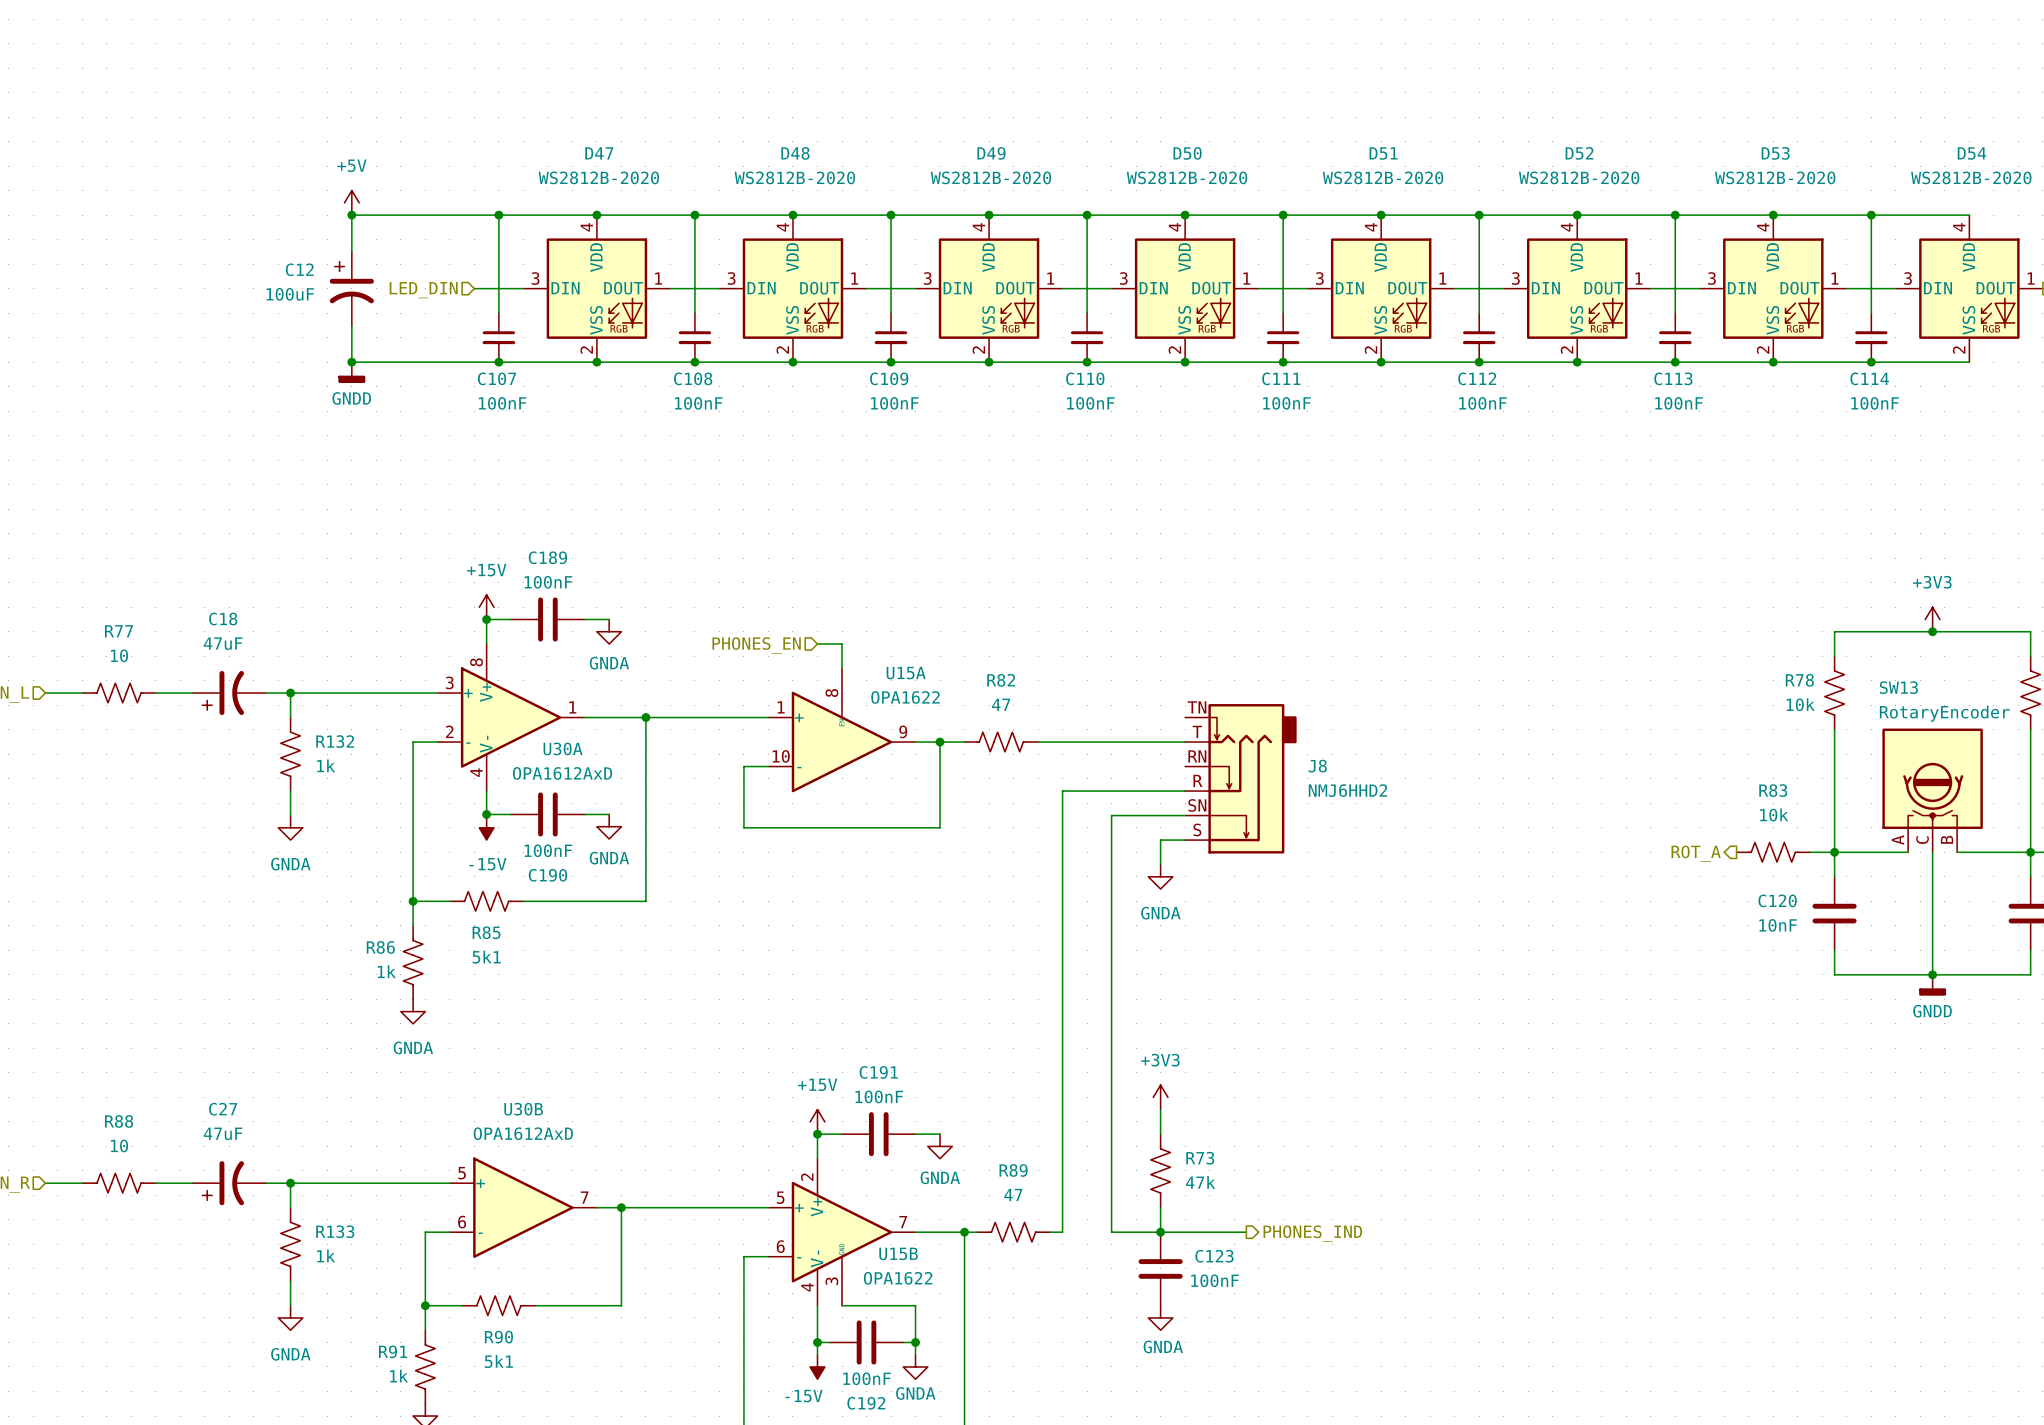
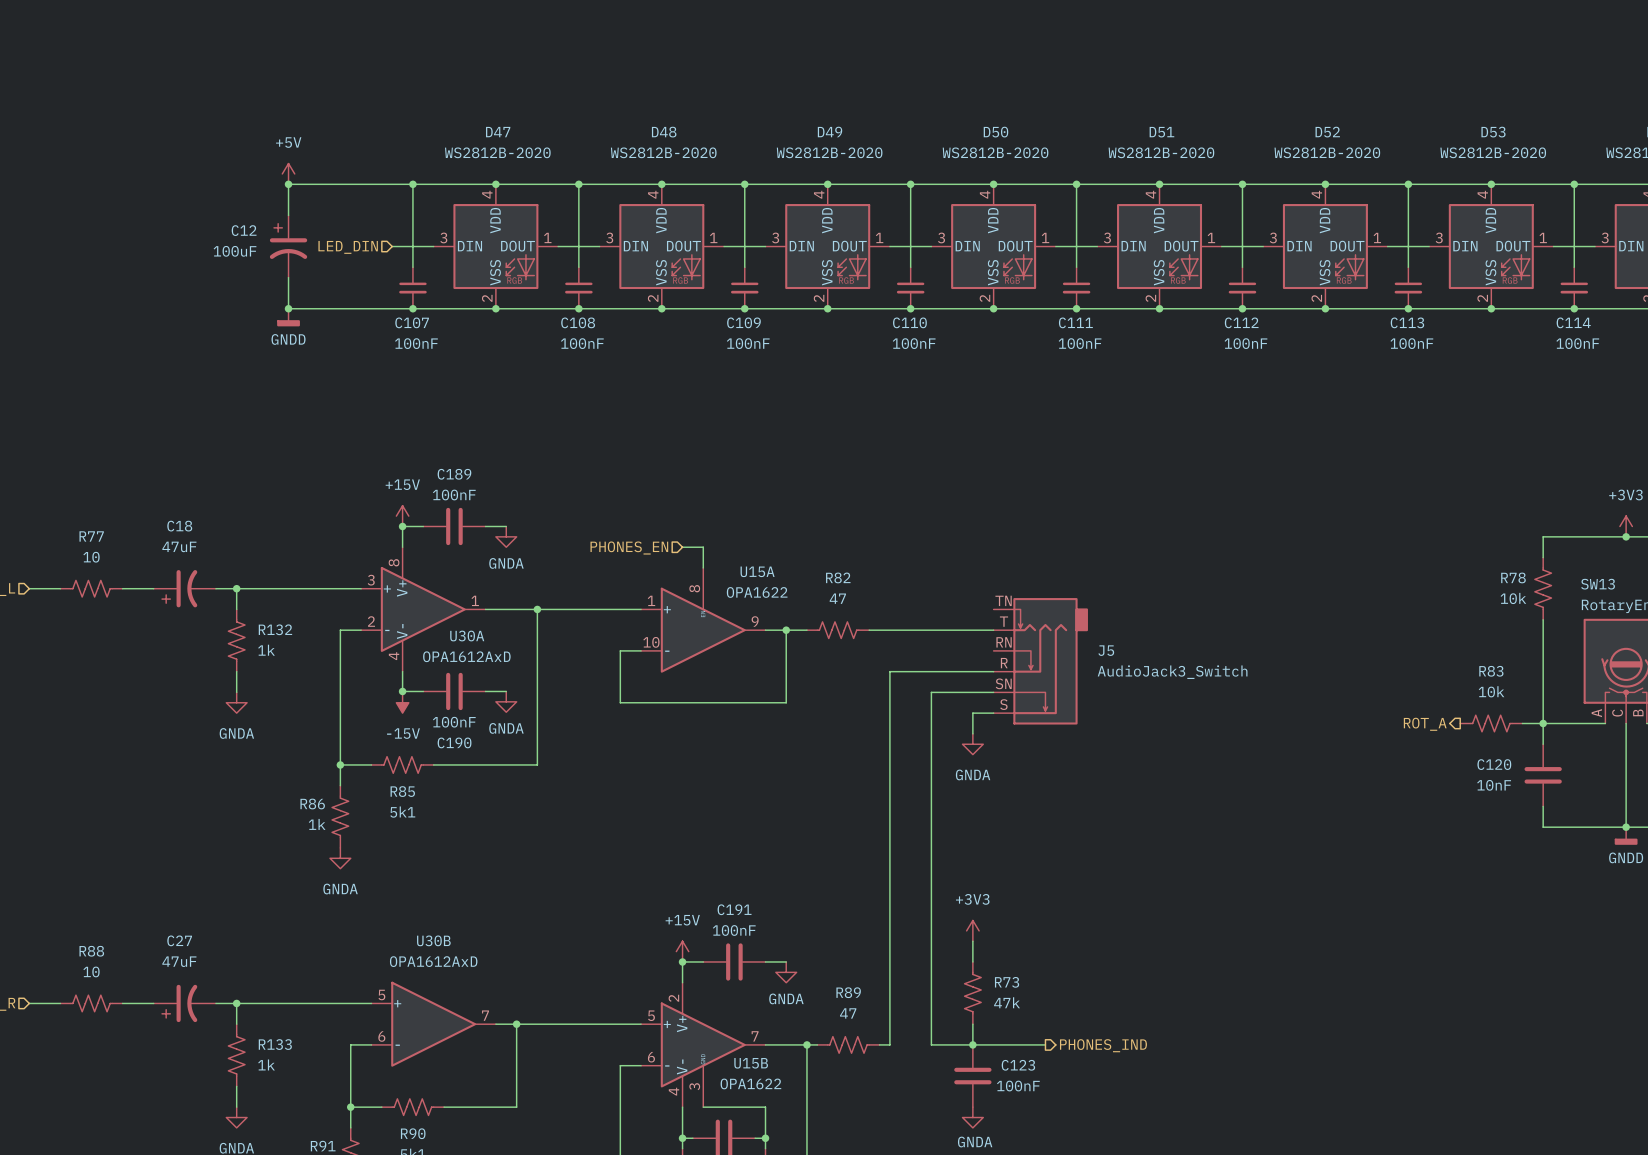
J8 name: J8 (1317, 766) -> J5 (1106, 650)
J8 value: NMJ6HHD2 (1347, 790) -> AudioJack3_Switch (1172, 672)

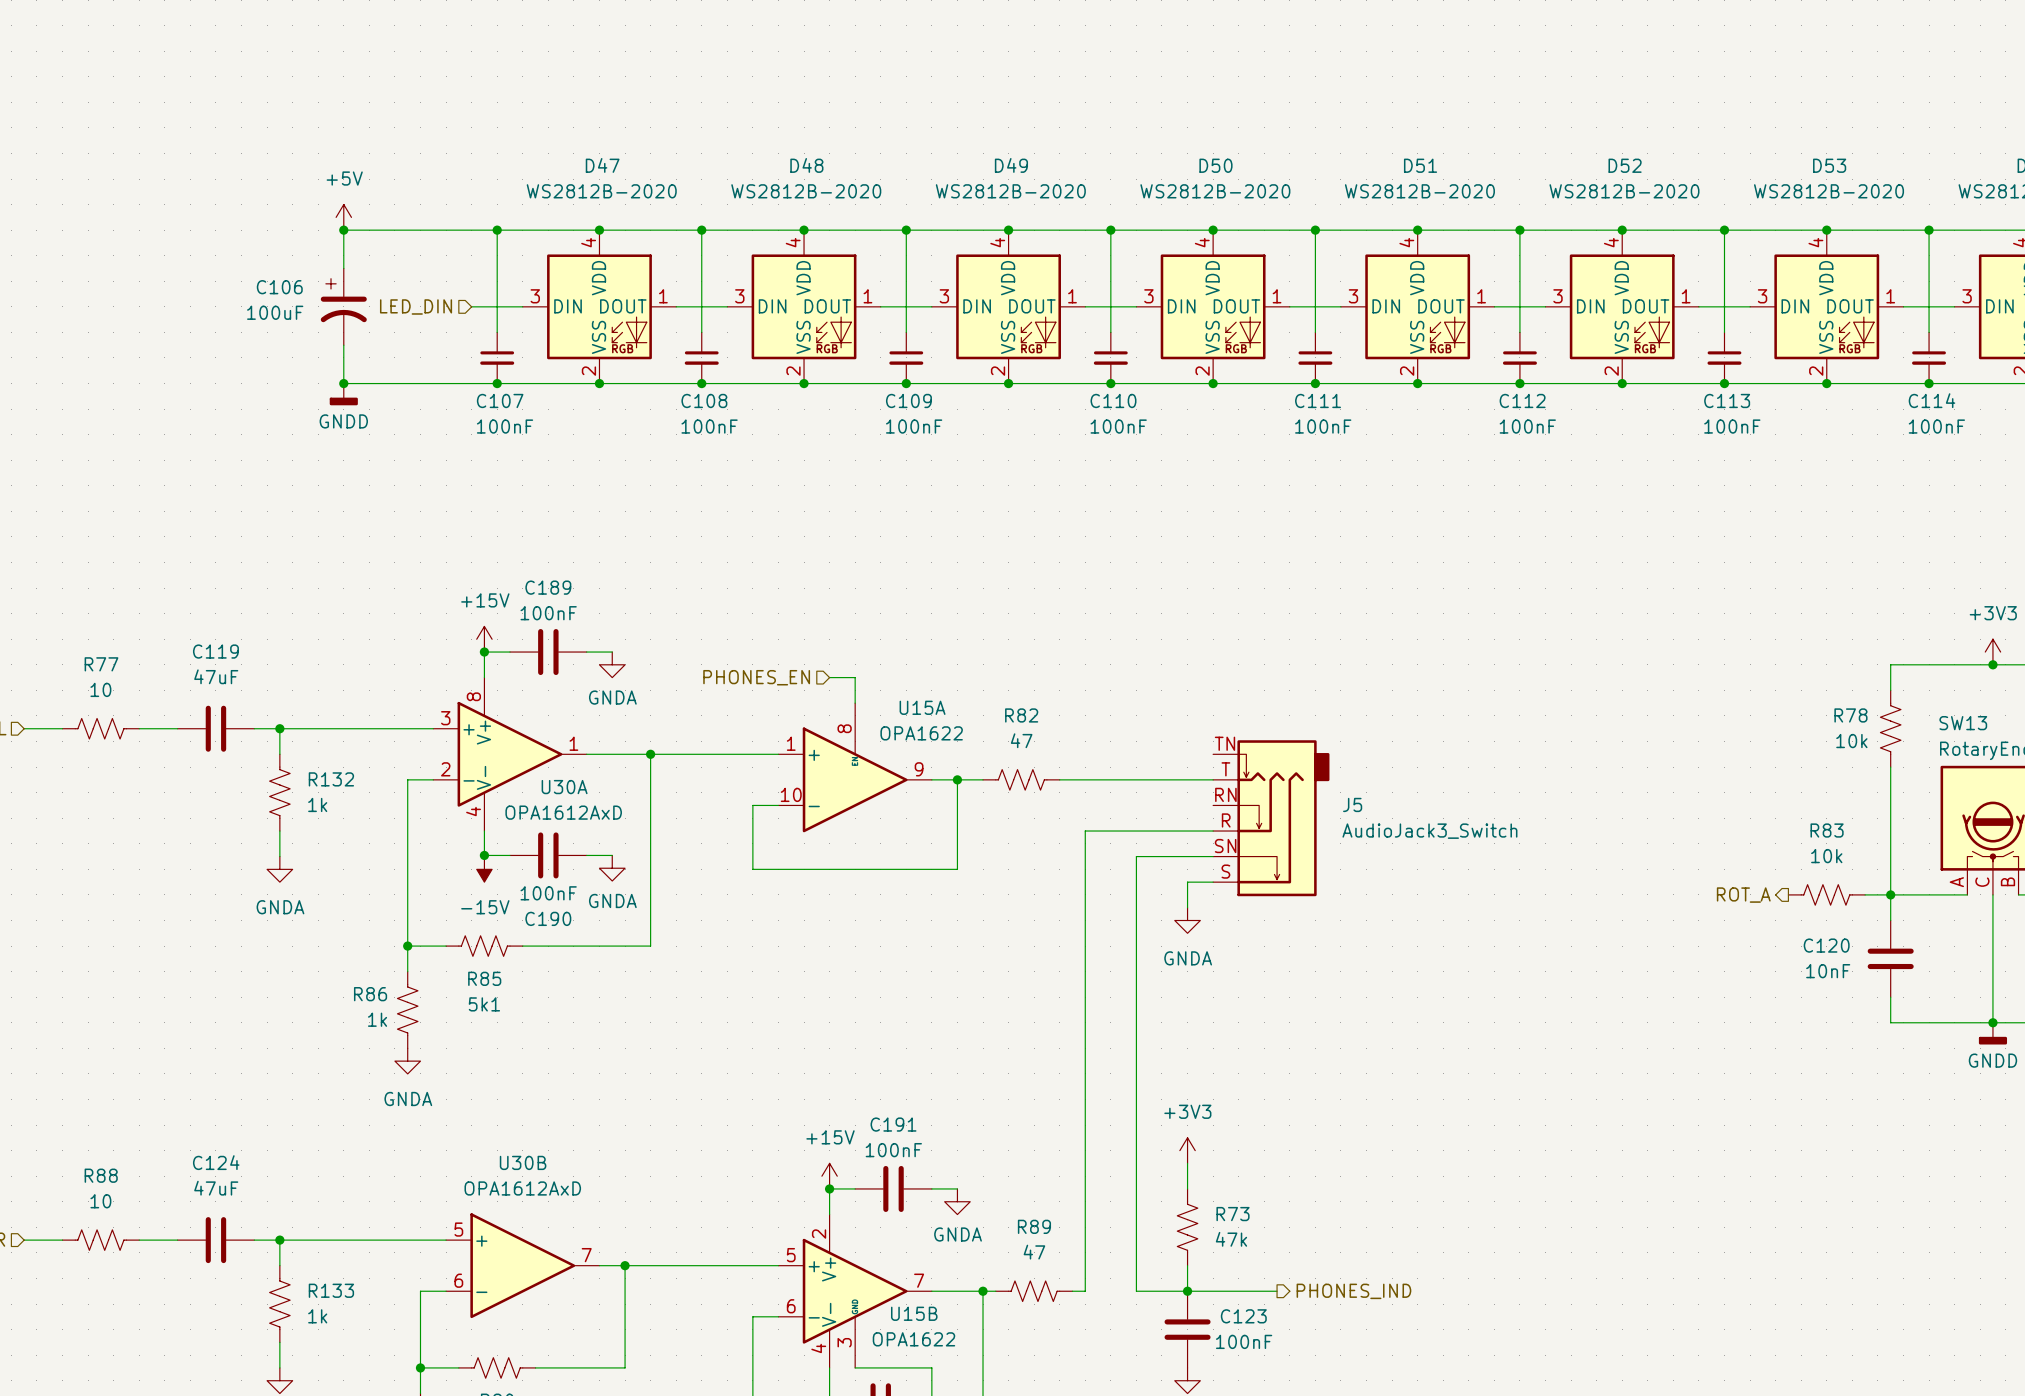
C12 name: C12 (244, 230) -> C106 (279, 287)
C18: 47uF (184, 588) -> none
C119: none -> 47uF (215, 728)
C27: 47uF (184, 1003) -> none
C124: none -> 47uF (215, 1240)

